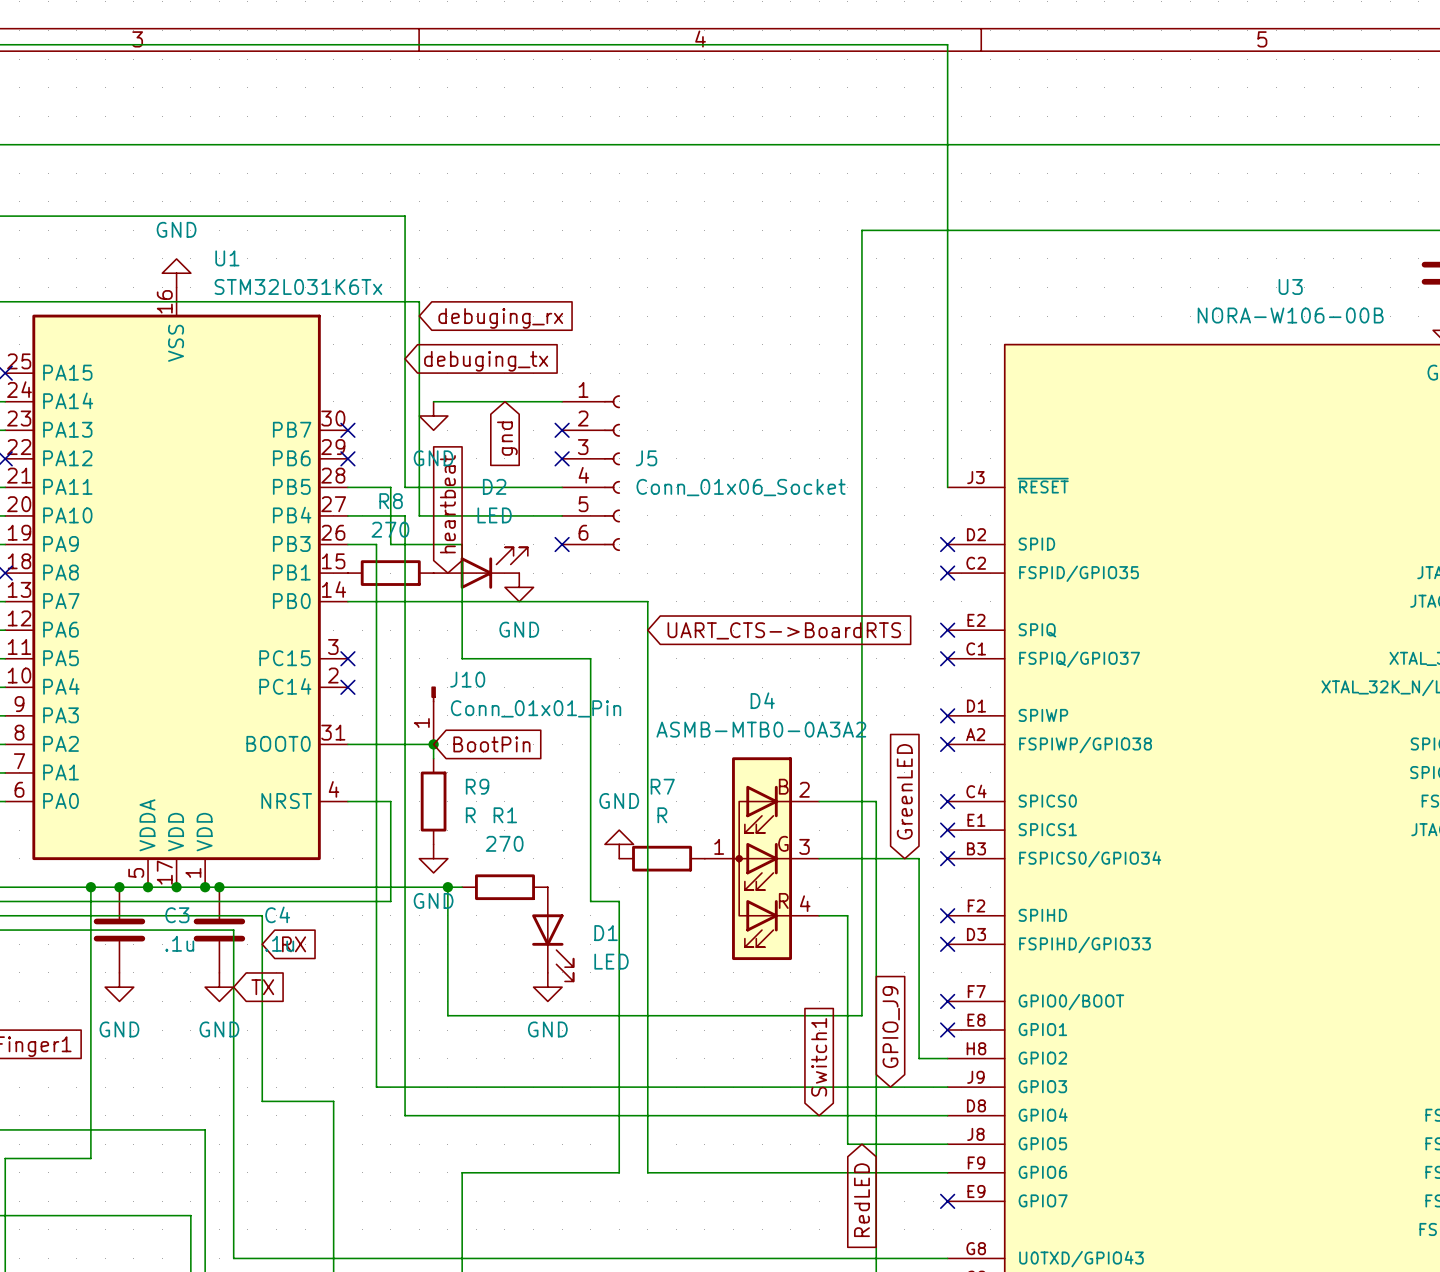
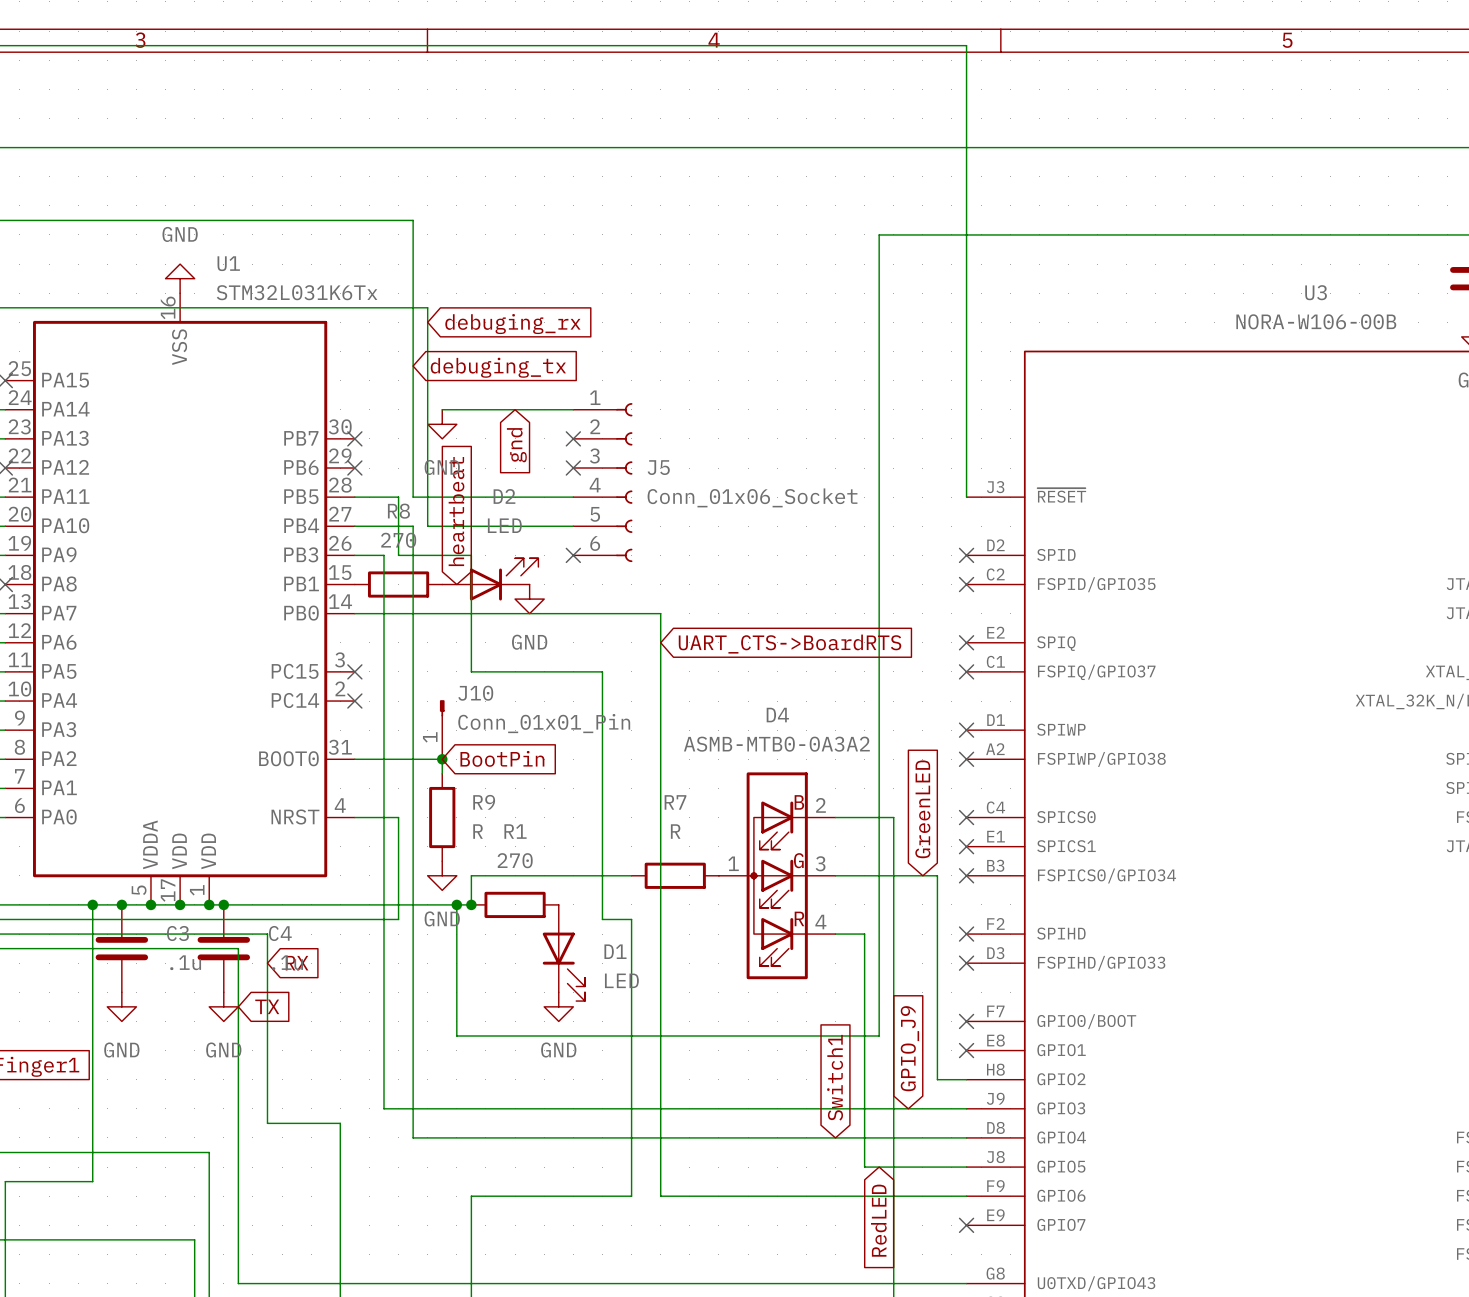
power symbol: GND (619, 844) -> none
wire: none -> (631, 875) (471, 875) (471, 904)
junction: none -> (471, 904)

